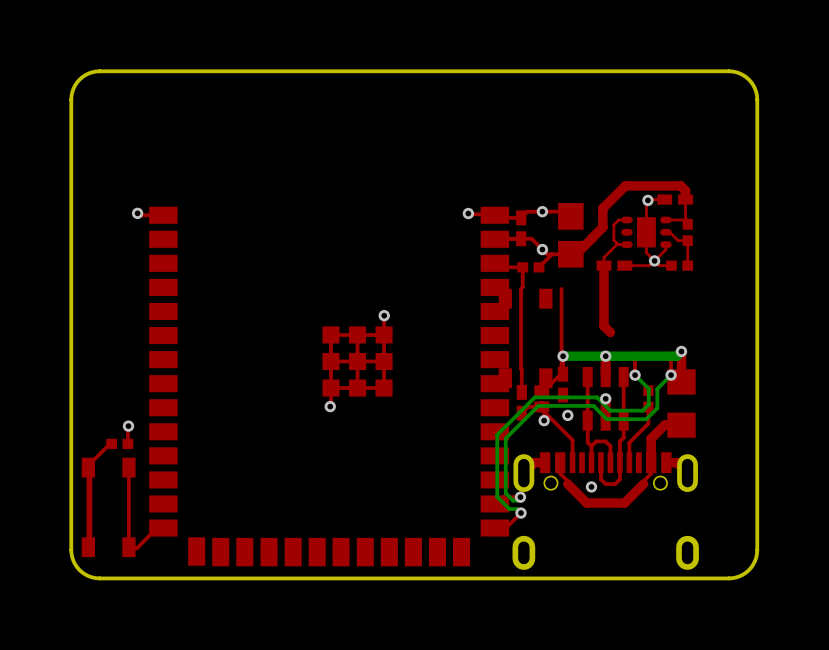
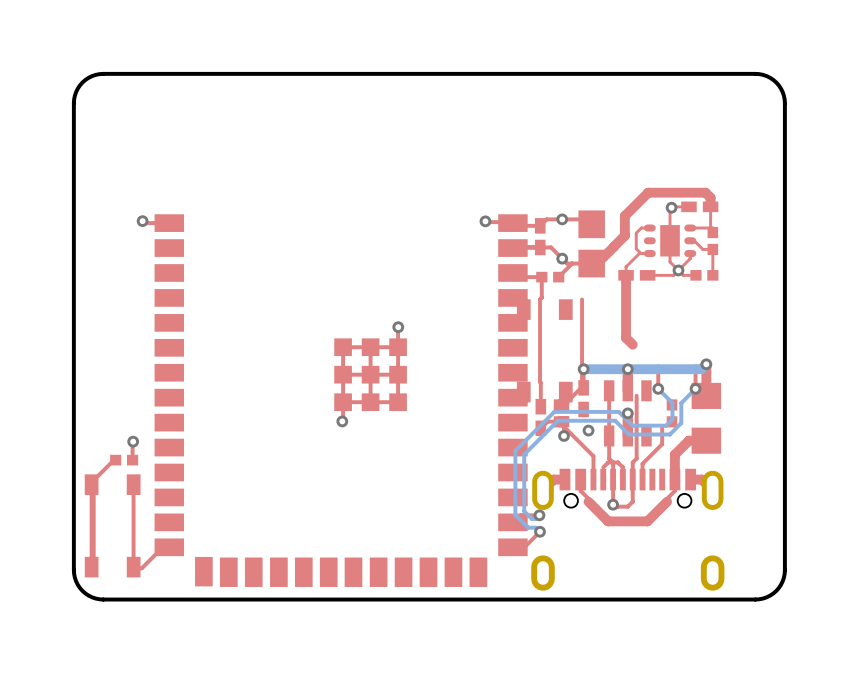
top track: (623, 377) (623, 437) (619, 441) (619, 447) -> (662, 426) (662, 444) (642, 463)
top track: (648, 406) (648, 423) (629, 442) (629, 462) -> none
top track: (610, 446) (605, 441) (596, 441) (591, 446) -> (632, 462) (636, 458) (636, 395)
top track: none -> (603, 467) (608, 462) (617, 462) (622, 467) (622, 479)
top track: none -> (632, 479) (632, 501) (627, 506) (617, 506) (613, 501) (613, 484)
top track: (619, 467) (619, 479) (615, 484) (605, 484) (600, 479) (600, 467) -> none

